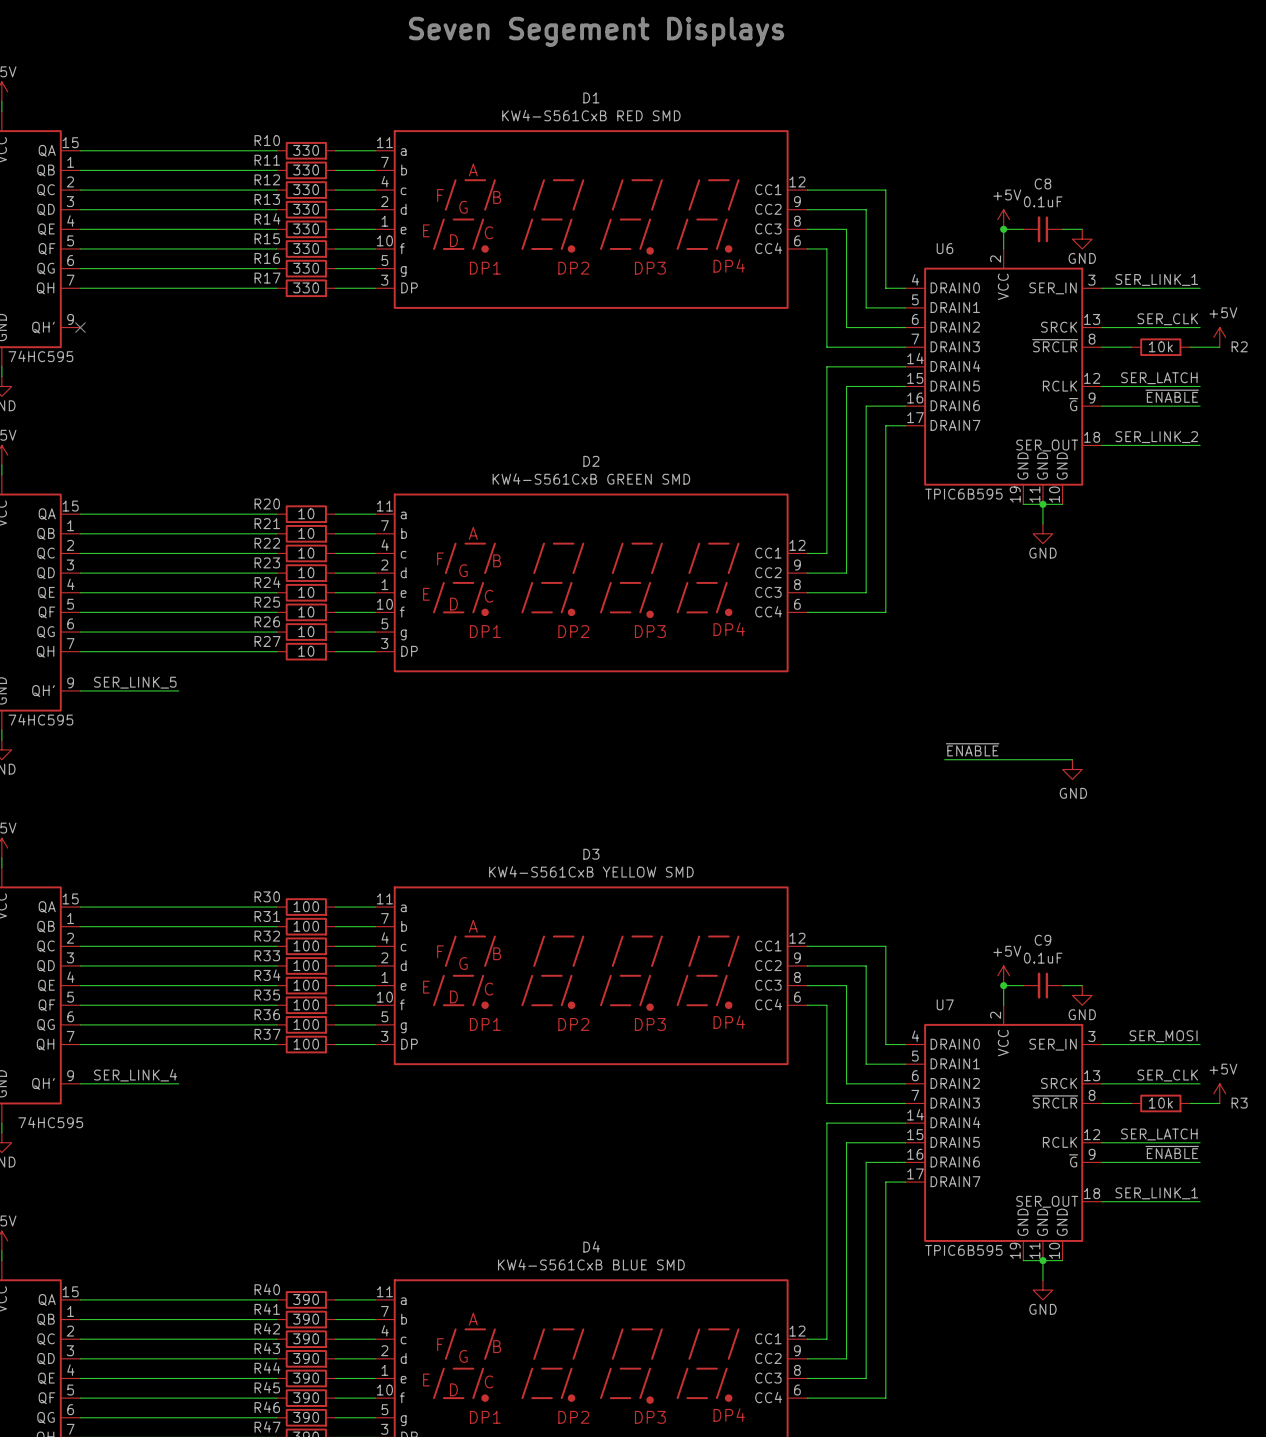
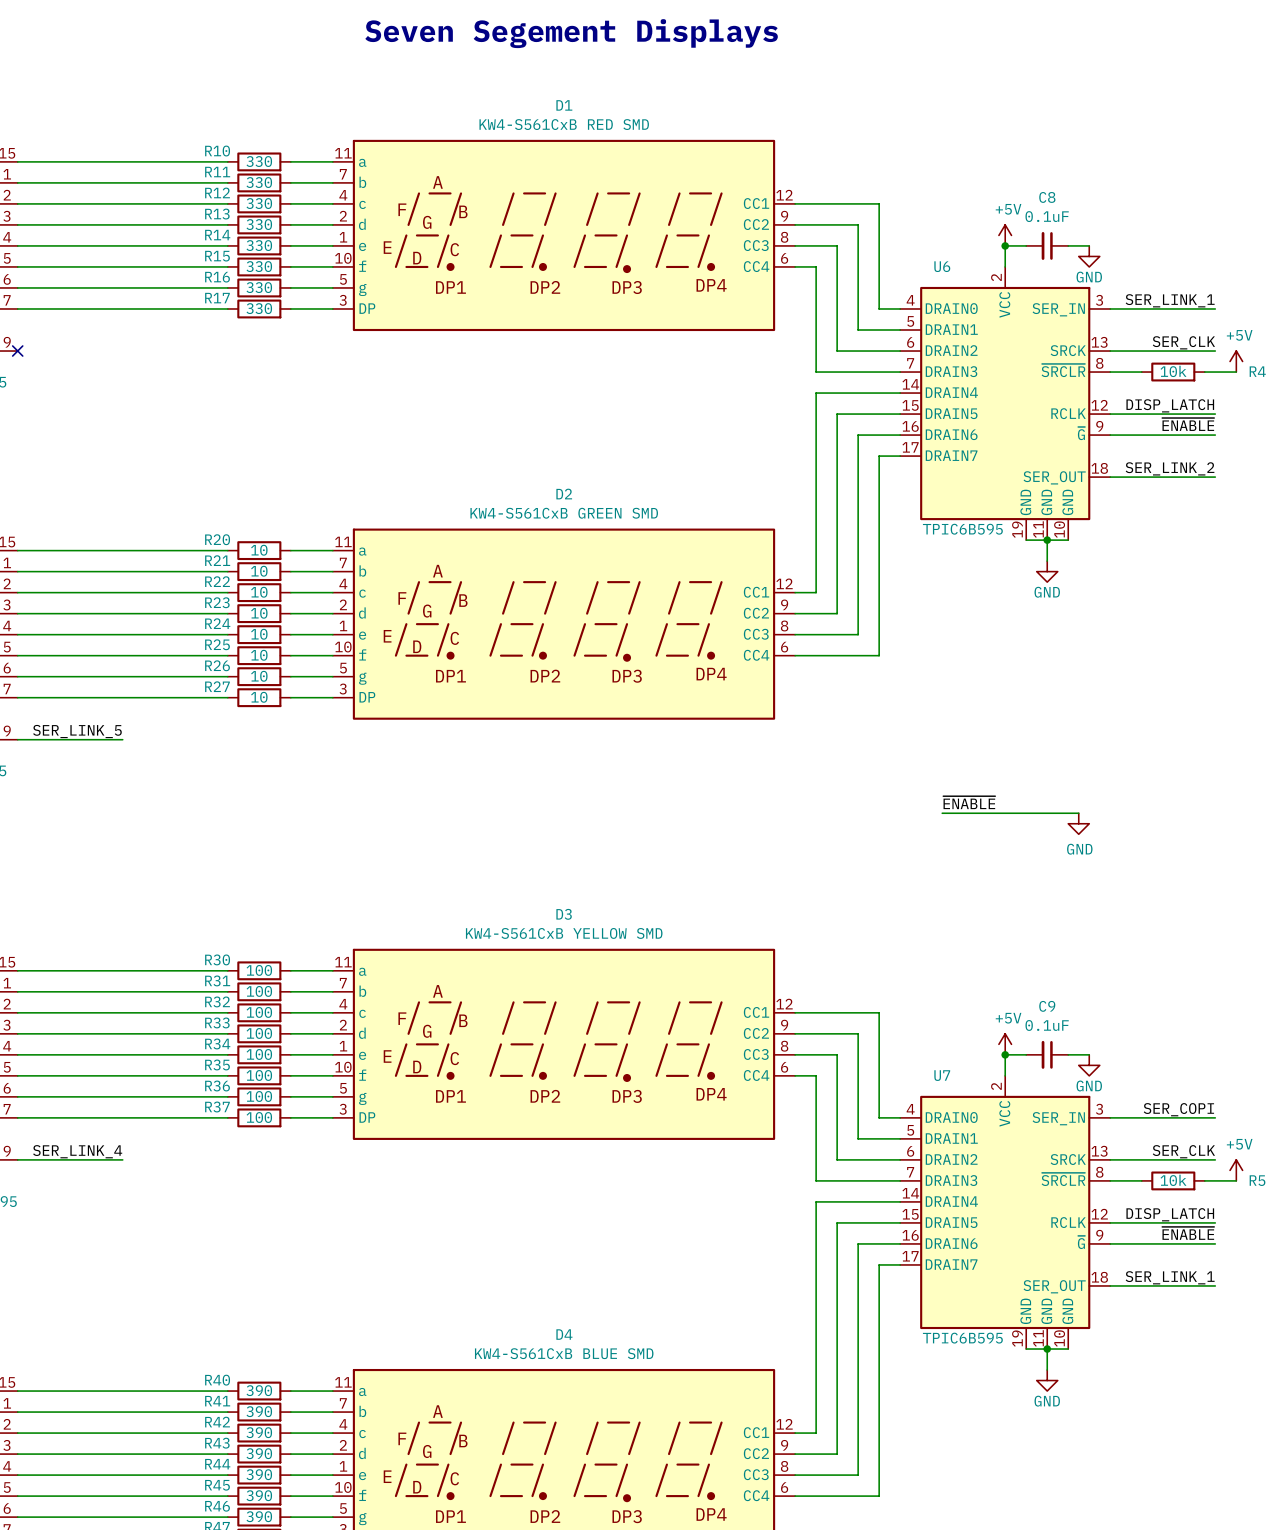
R2 name: R2 (1239, 346) -> R4 (1257, 371)
label: SER_LATCH (1159, 378) -> DISP_LATCH (1170, 405)
label: SER_MOSI (1163, 1036) -> SER_COPI (1178, 1109)
R3 name: R3 (1239, 1103) -> R5 (1257, 1180)
label: SER_LATCH (1159, 1134) -> DISP_LATCH (1170, 1214)

